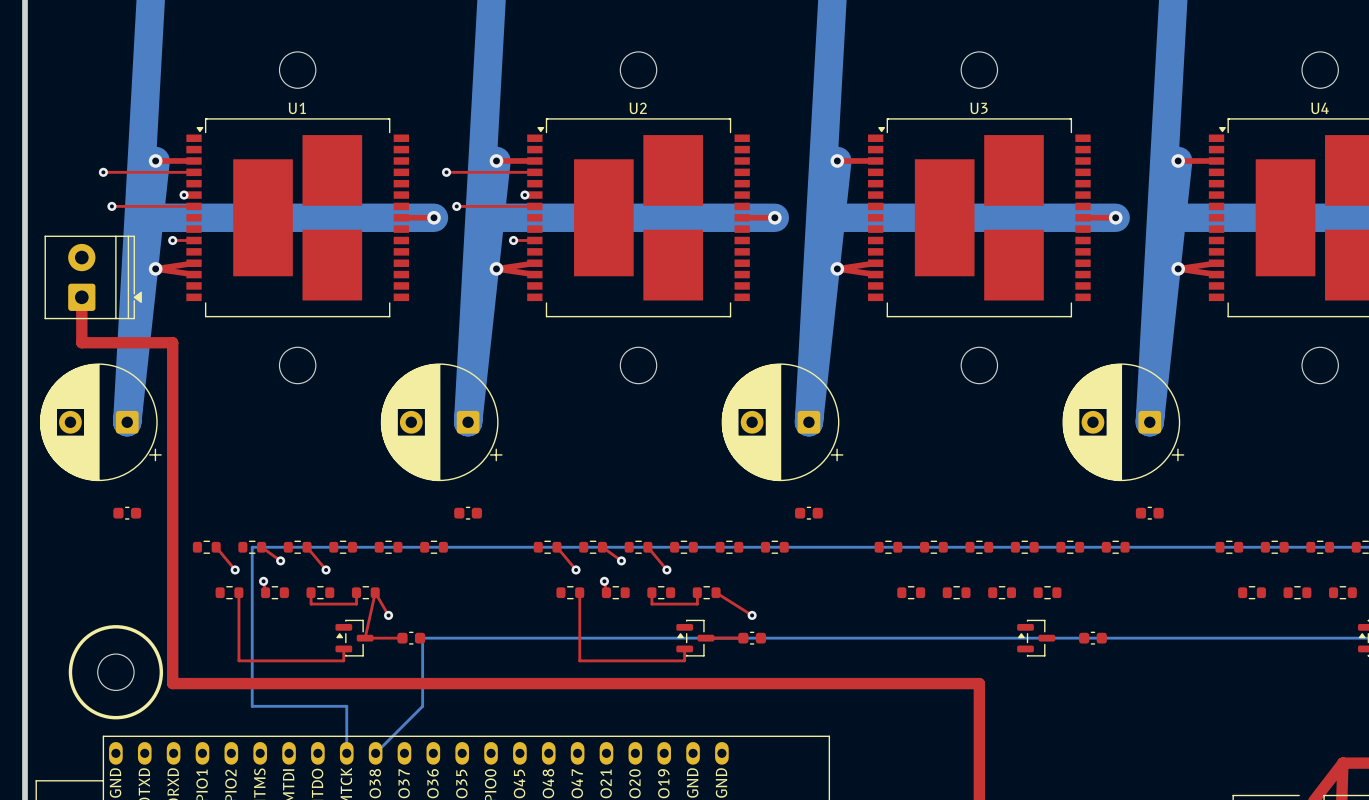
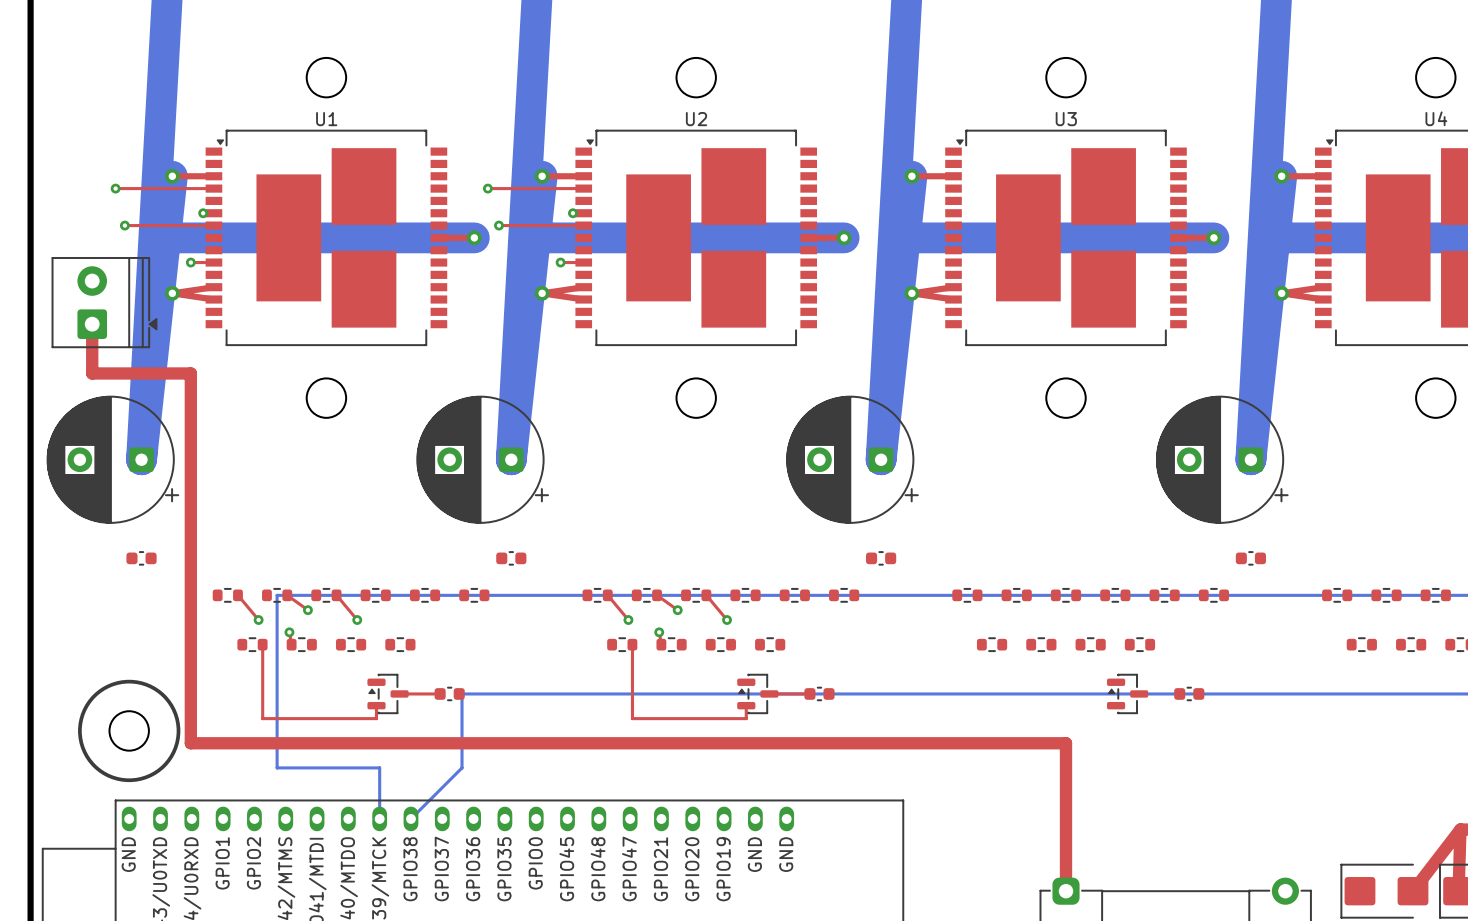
top track: (311, 592) (311, 604) (356, 604) (356, 592) -> none
top track: (651, 592) (651, 604) (697, 604) (697, 592) -> none
top track: (716, 592) (752, 615) -> none
top track: (388, 615) (375, 592) (365, 638) -> none
via: (388, 615) -> none
via: (752, 615) -> none

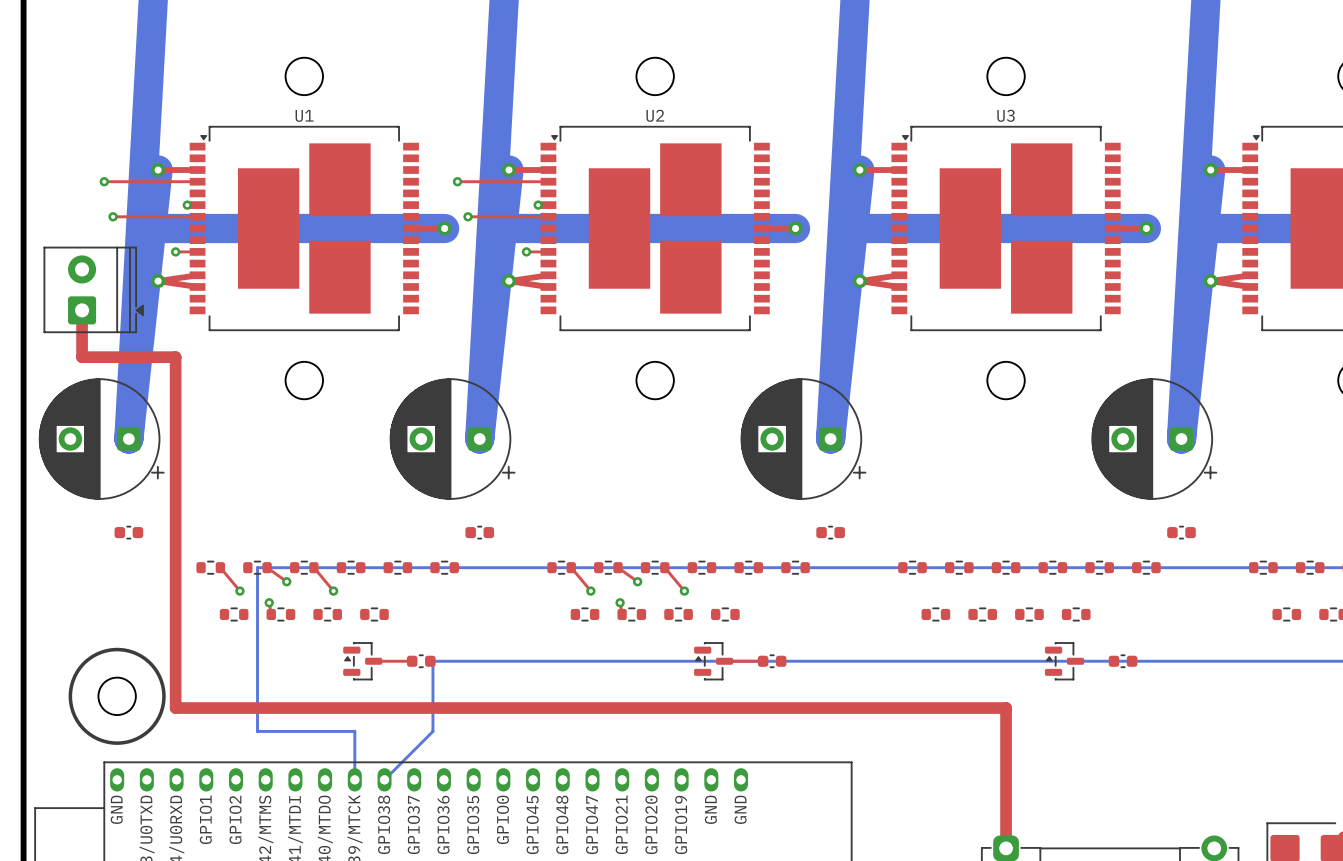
top track: (262, 644) (262, 718) (376, 718) (376, 705) -> none
top track: (632, 644) (632, 718) (746, 718) (746, 705) -> none

